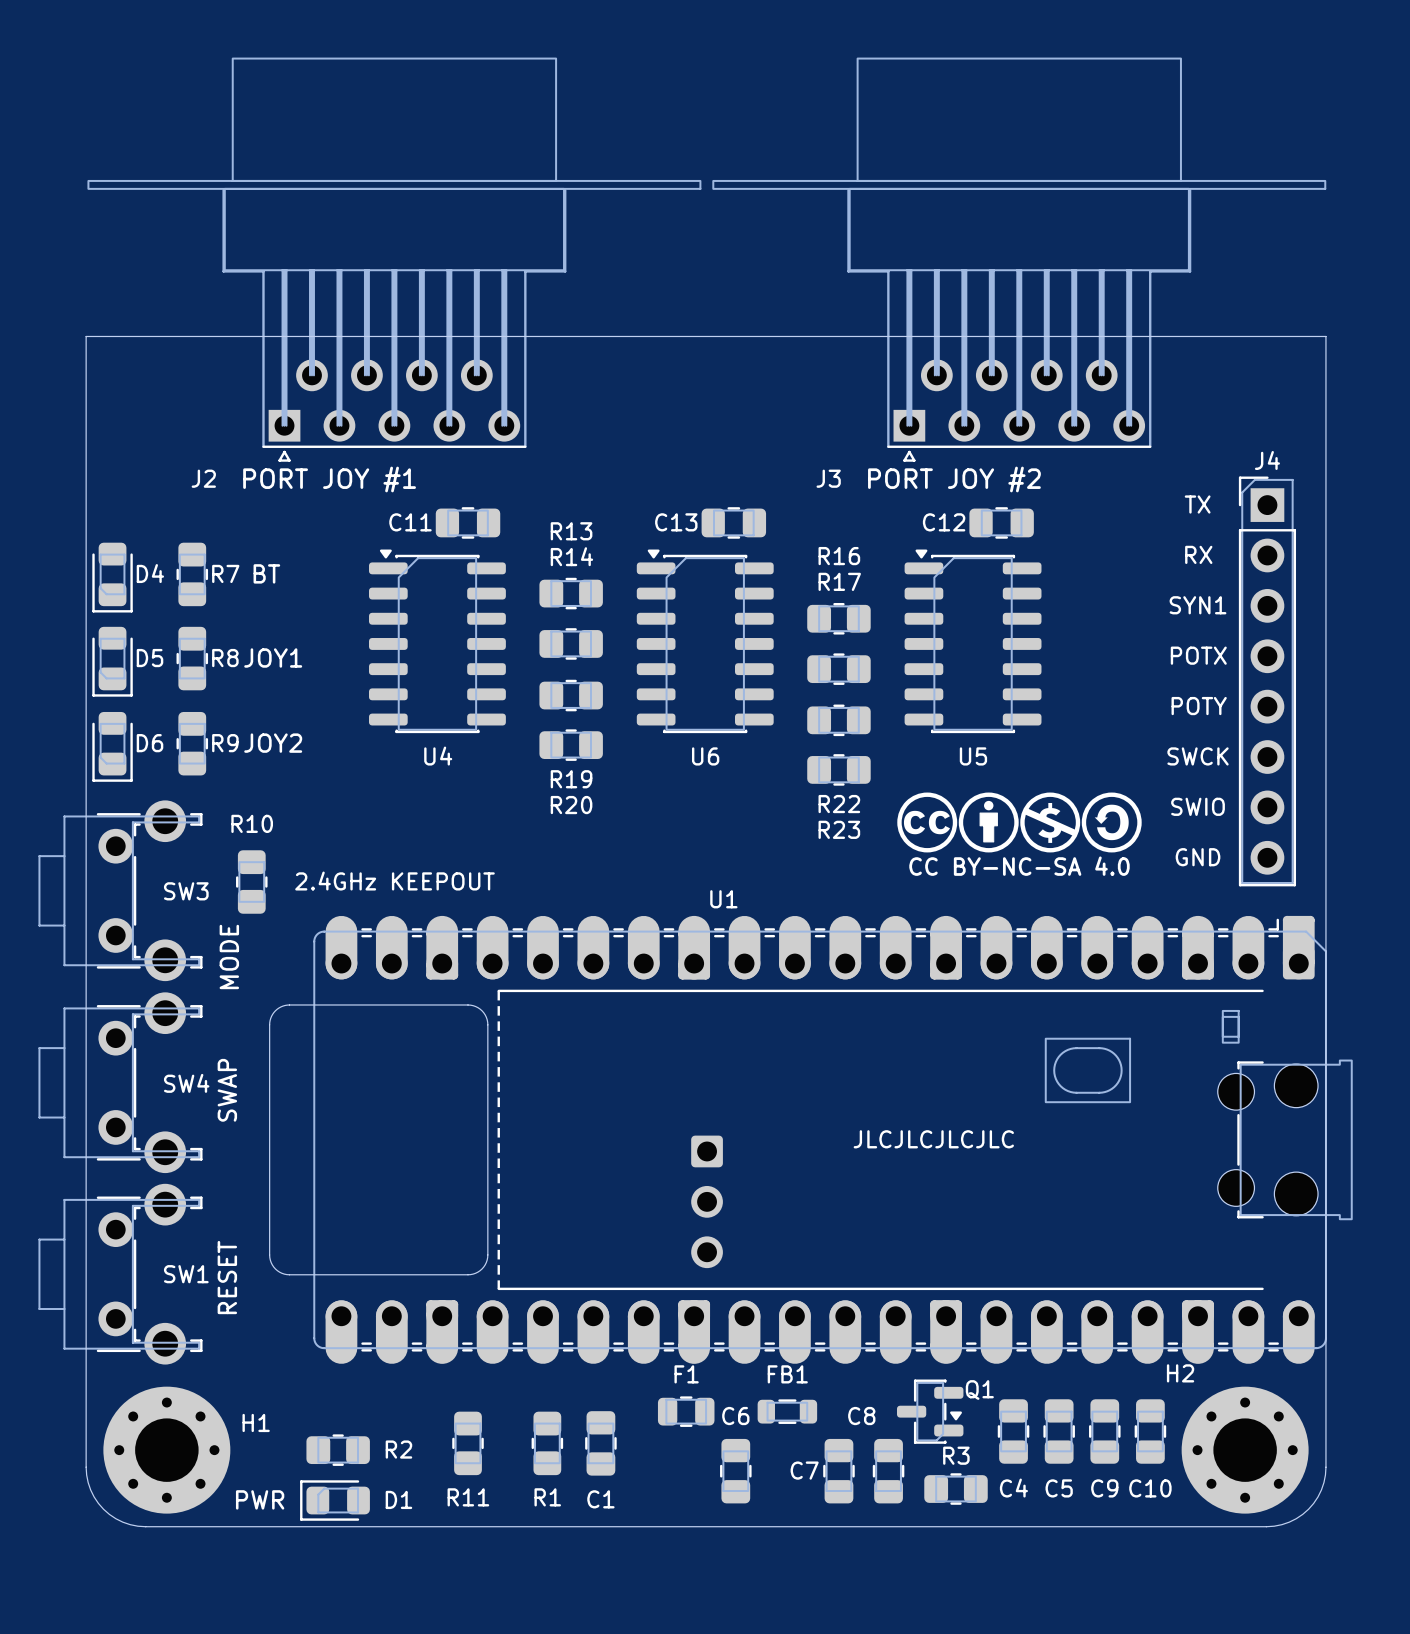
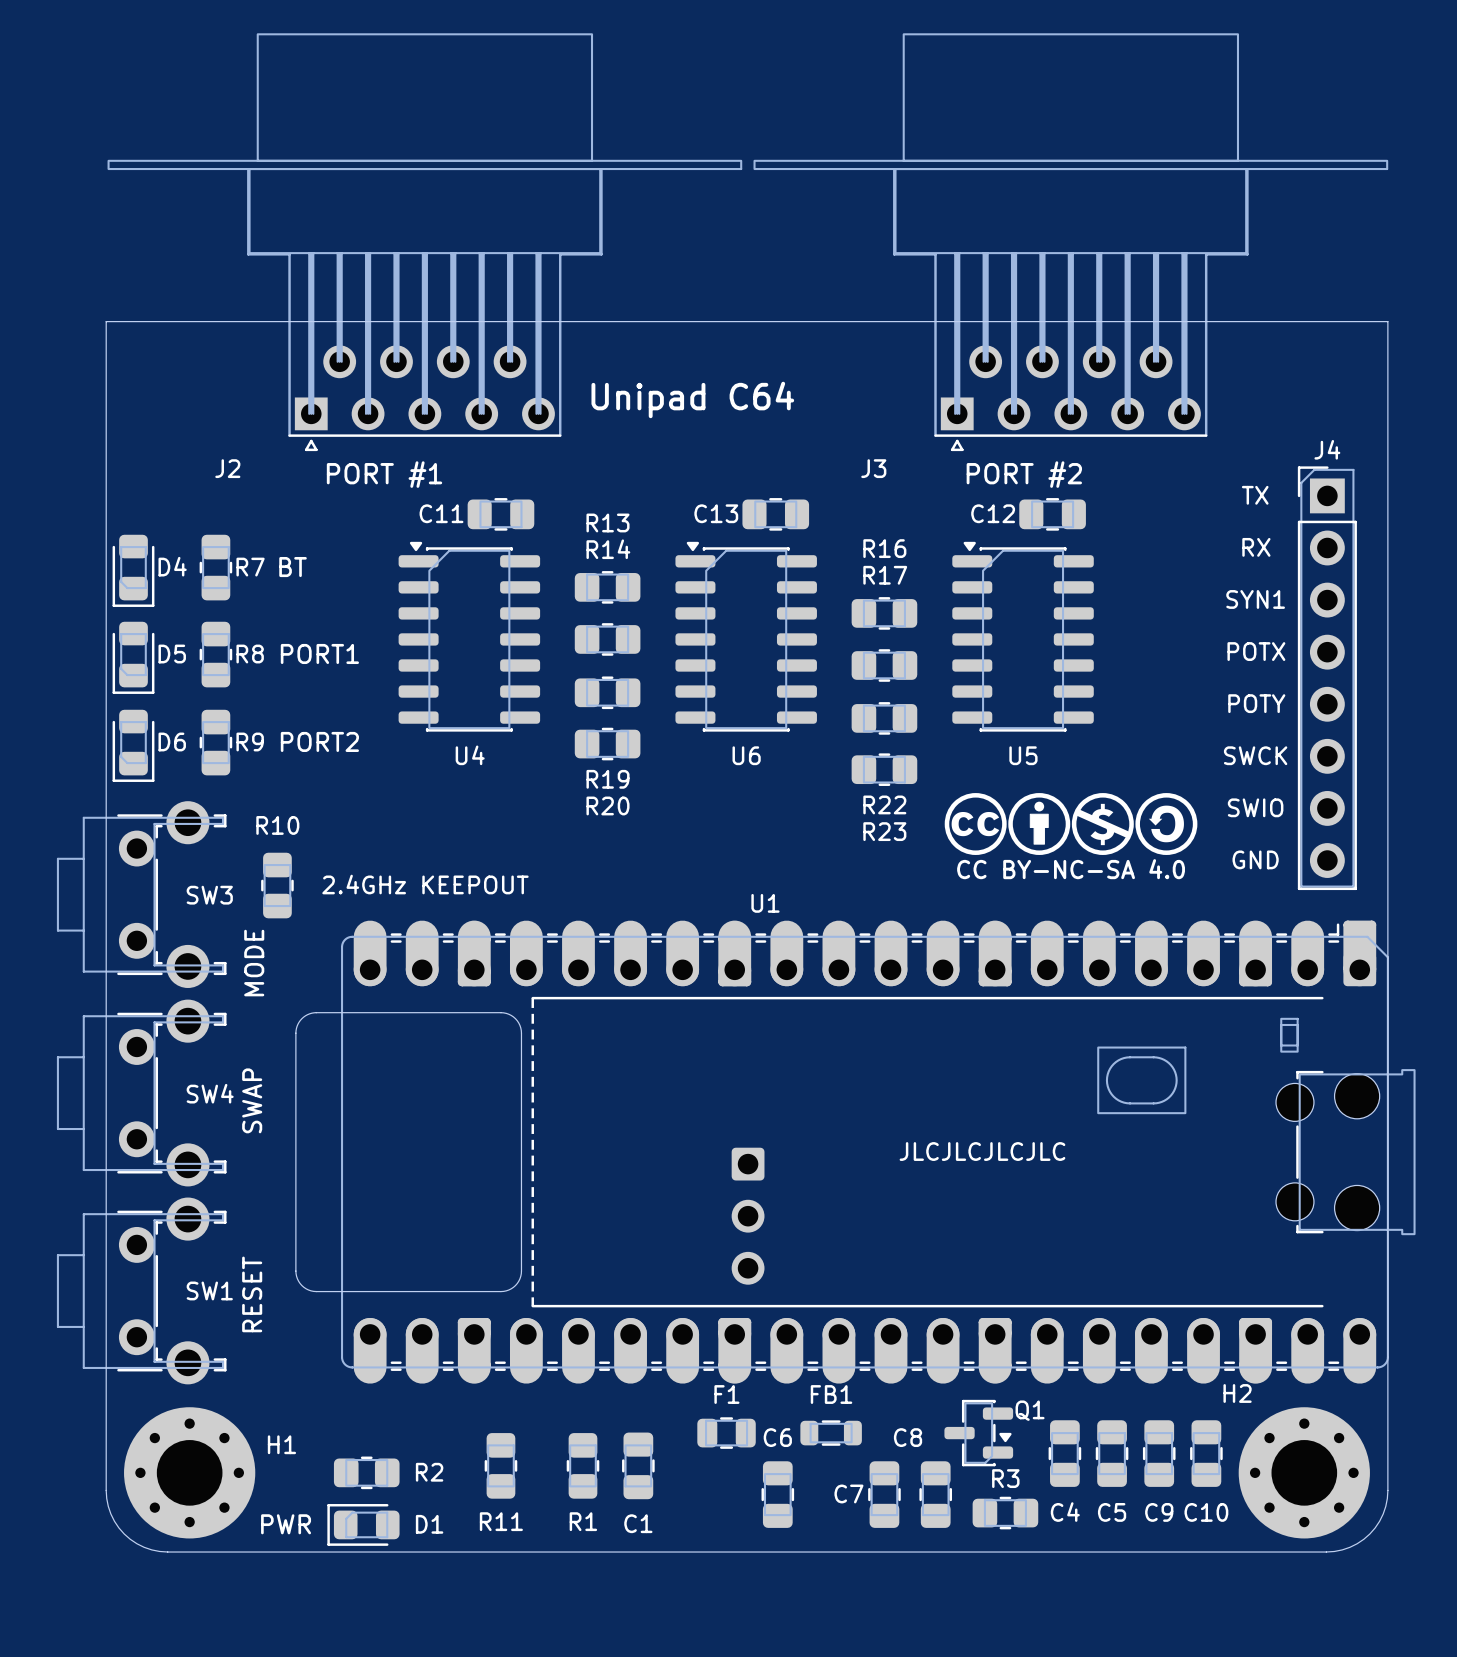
text: none -> Unipad C64 (692, 399)
text: PORT JOY #1 (329, 479) -> PORT #1 (384, 474)
text: PORT JOY #2 (954, 479) -> PORT #2 (1024, 474)
text: JOY1 (273, 658) -> PORT1 (319, 653)
text: JOY2 (273, 743) -> PORT2 (319, 741)

